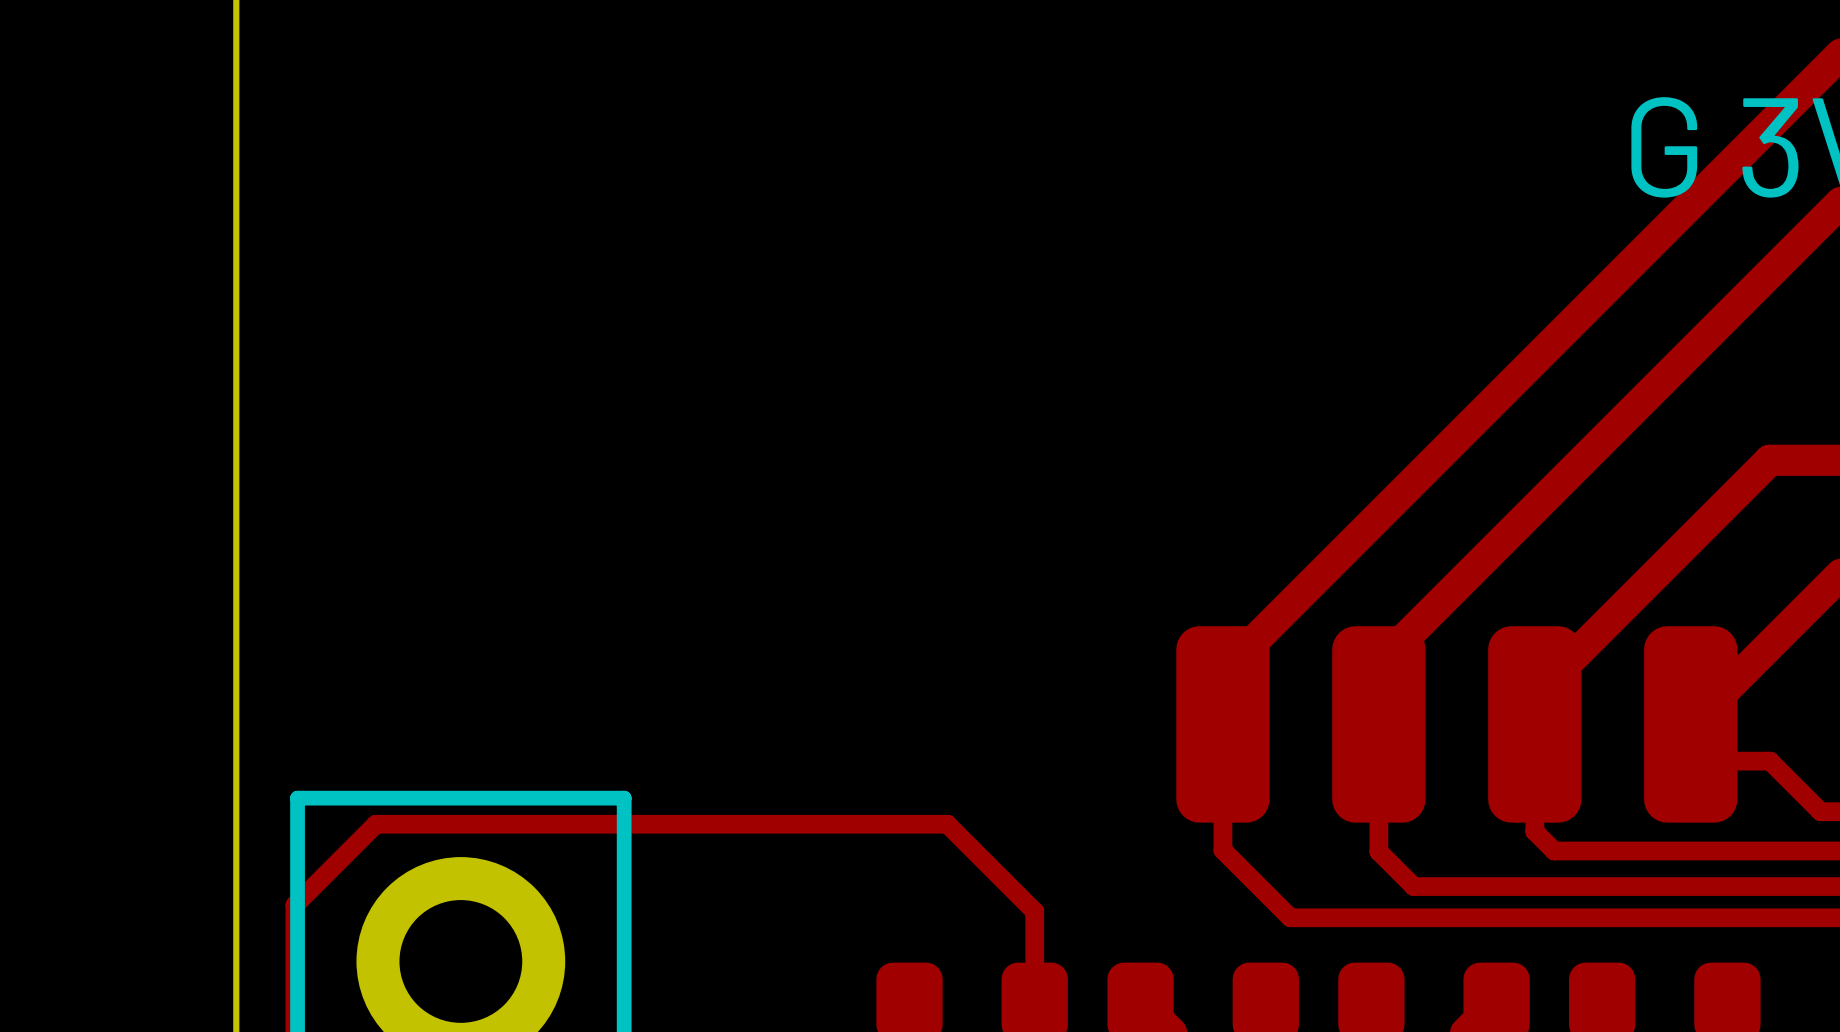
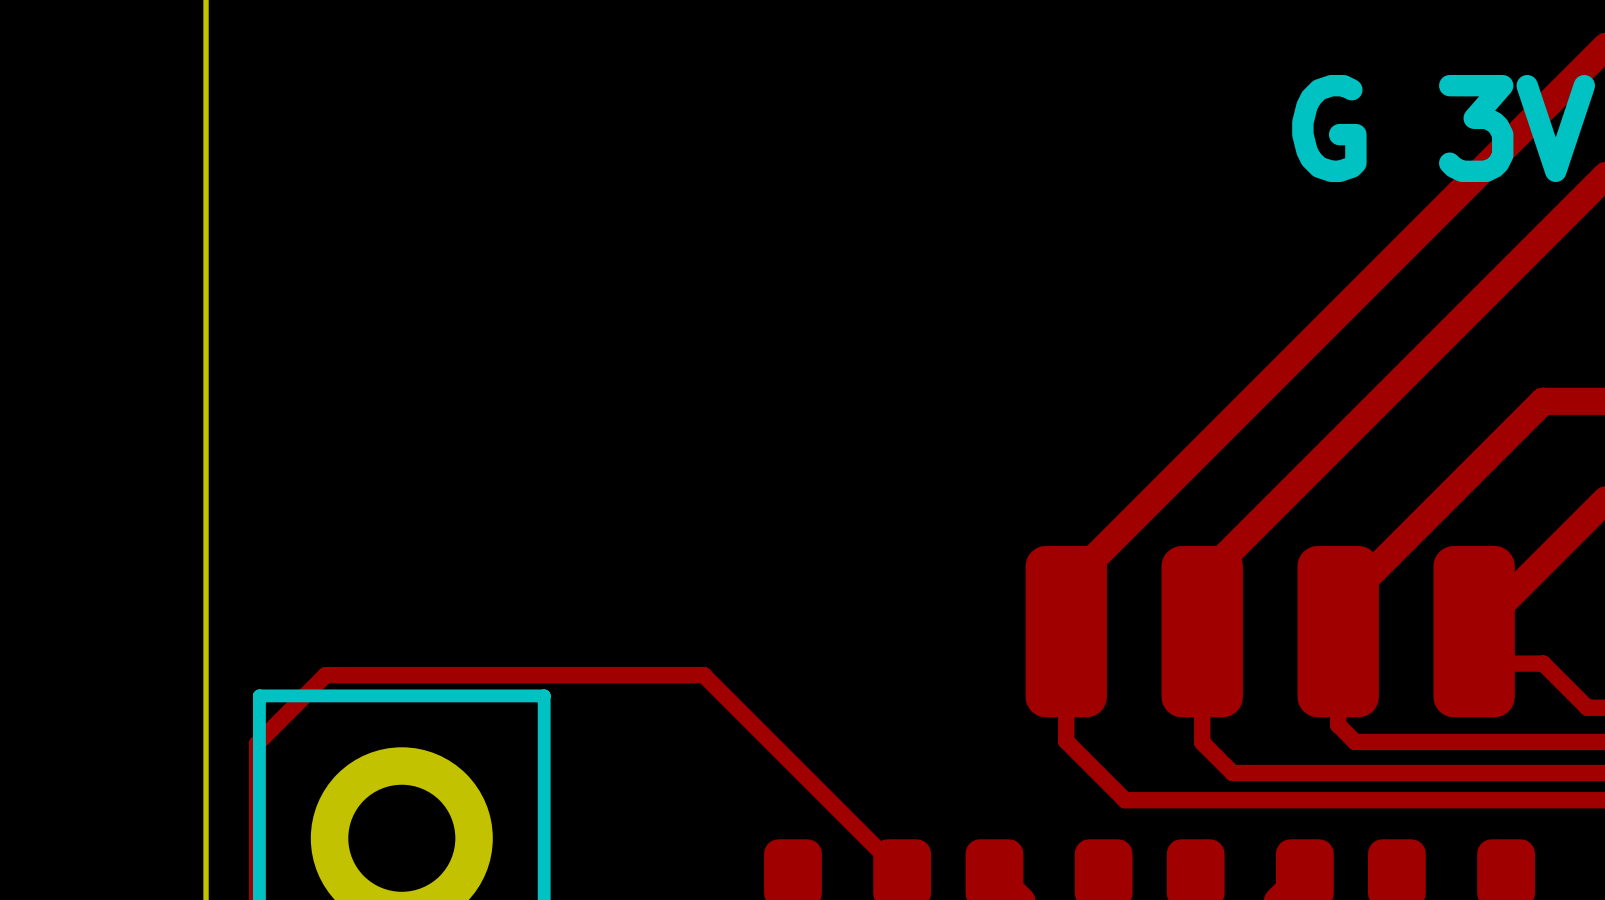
top track: (294, 905) (375, 824) (947, 824) (1034, 911) (1034, 1001) -> (257, 789) (257, 743) (325, 675) (703, 675) (902, 873)

